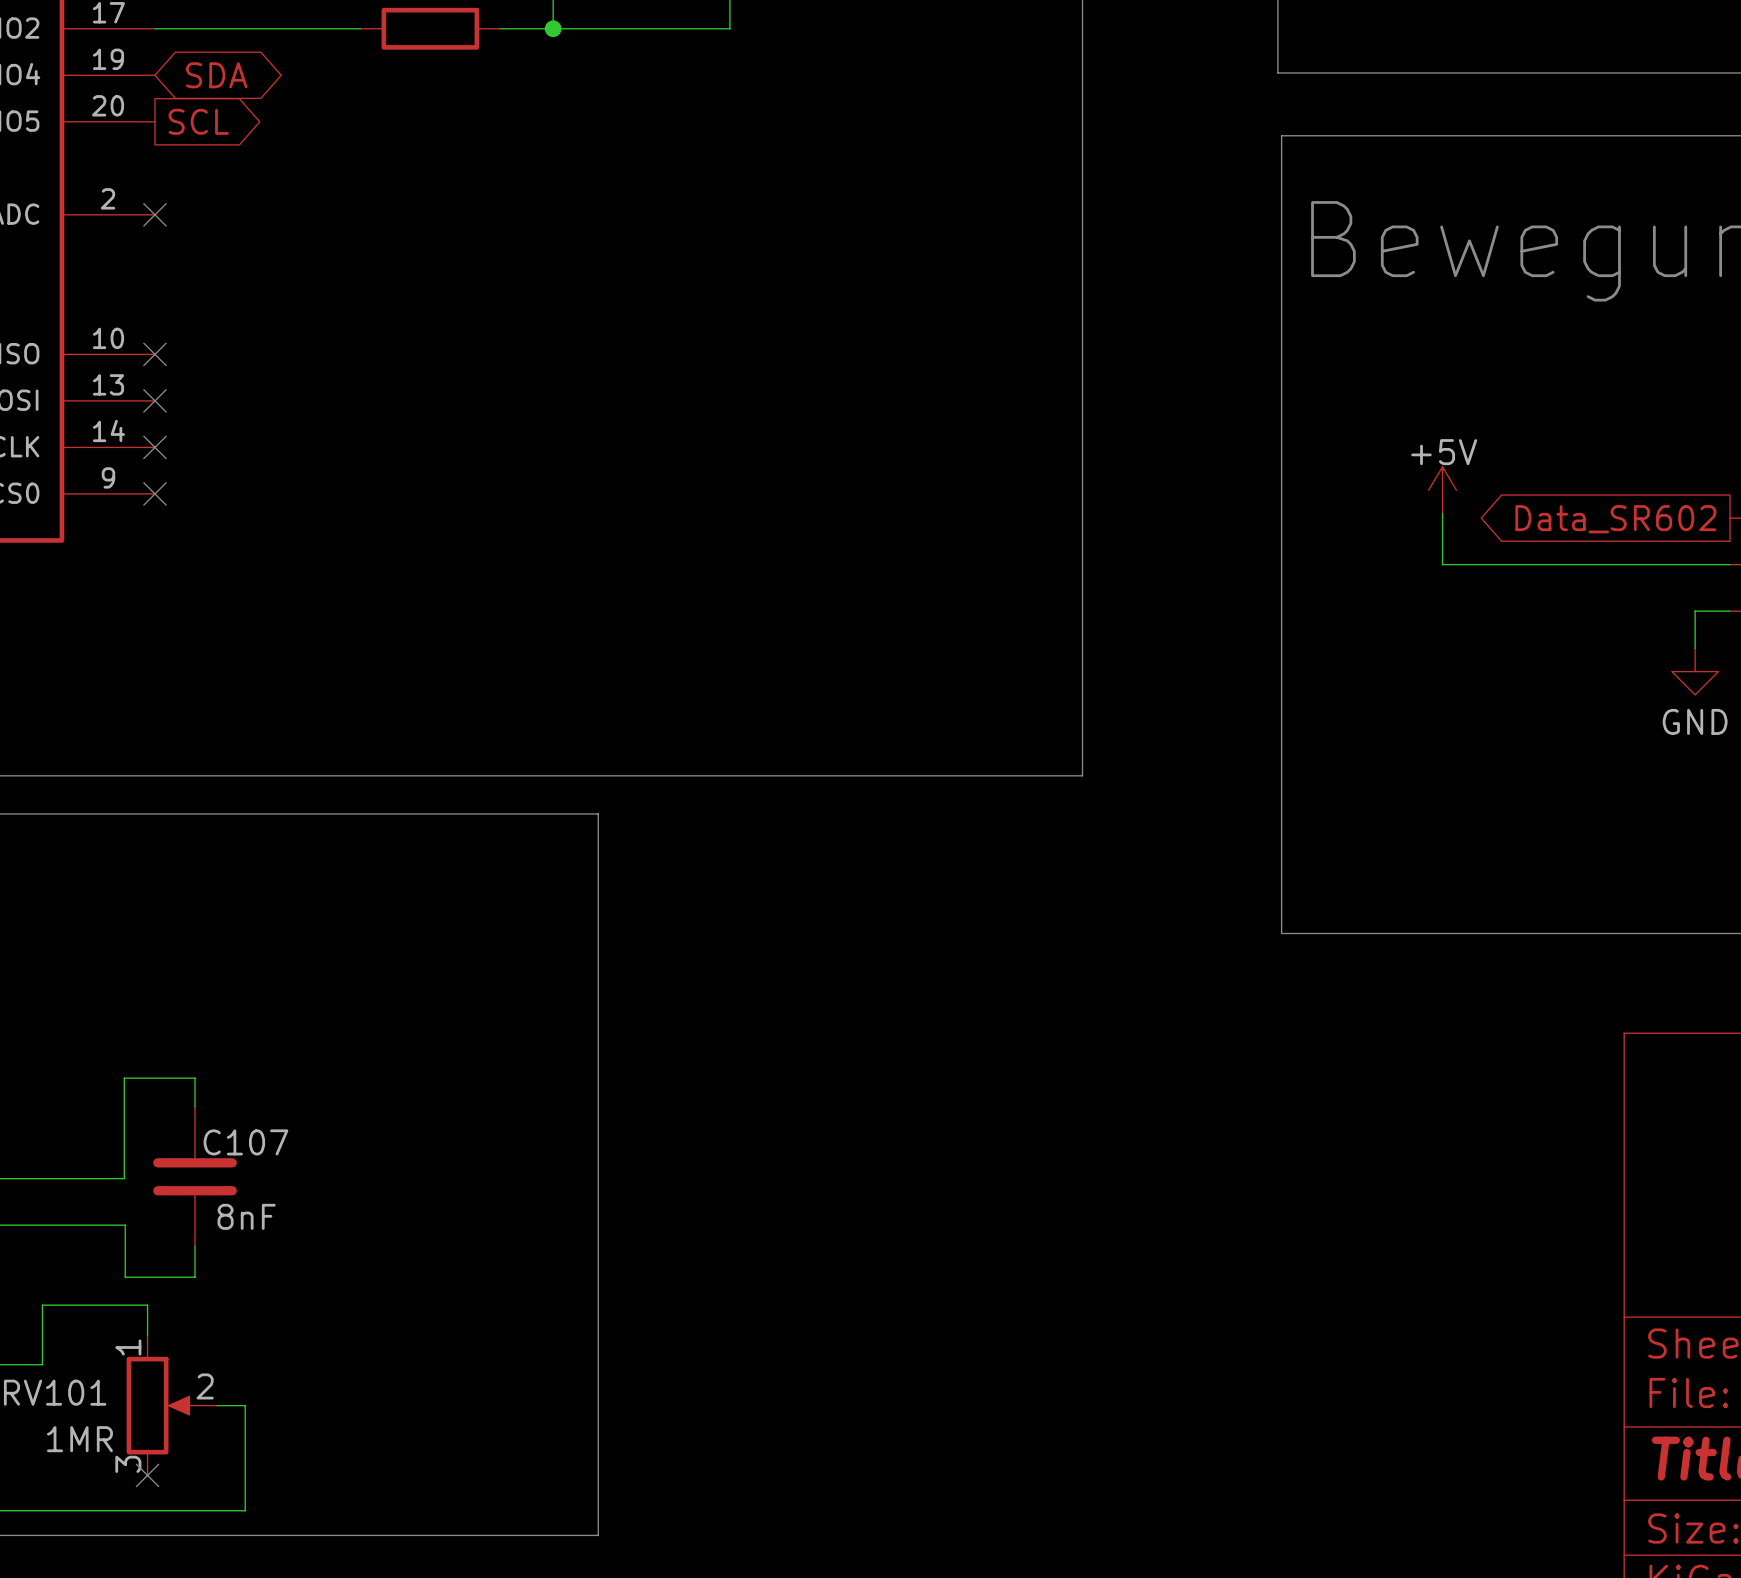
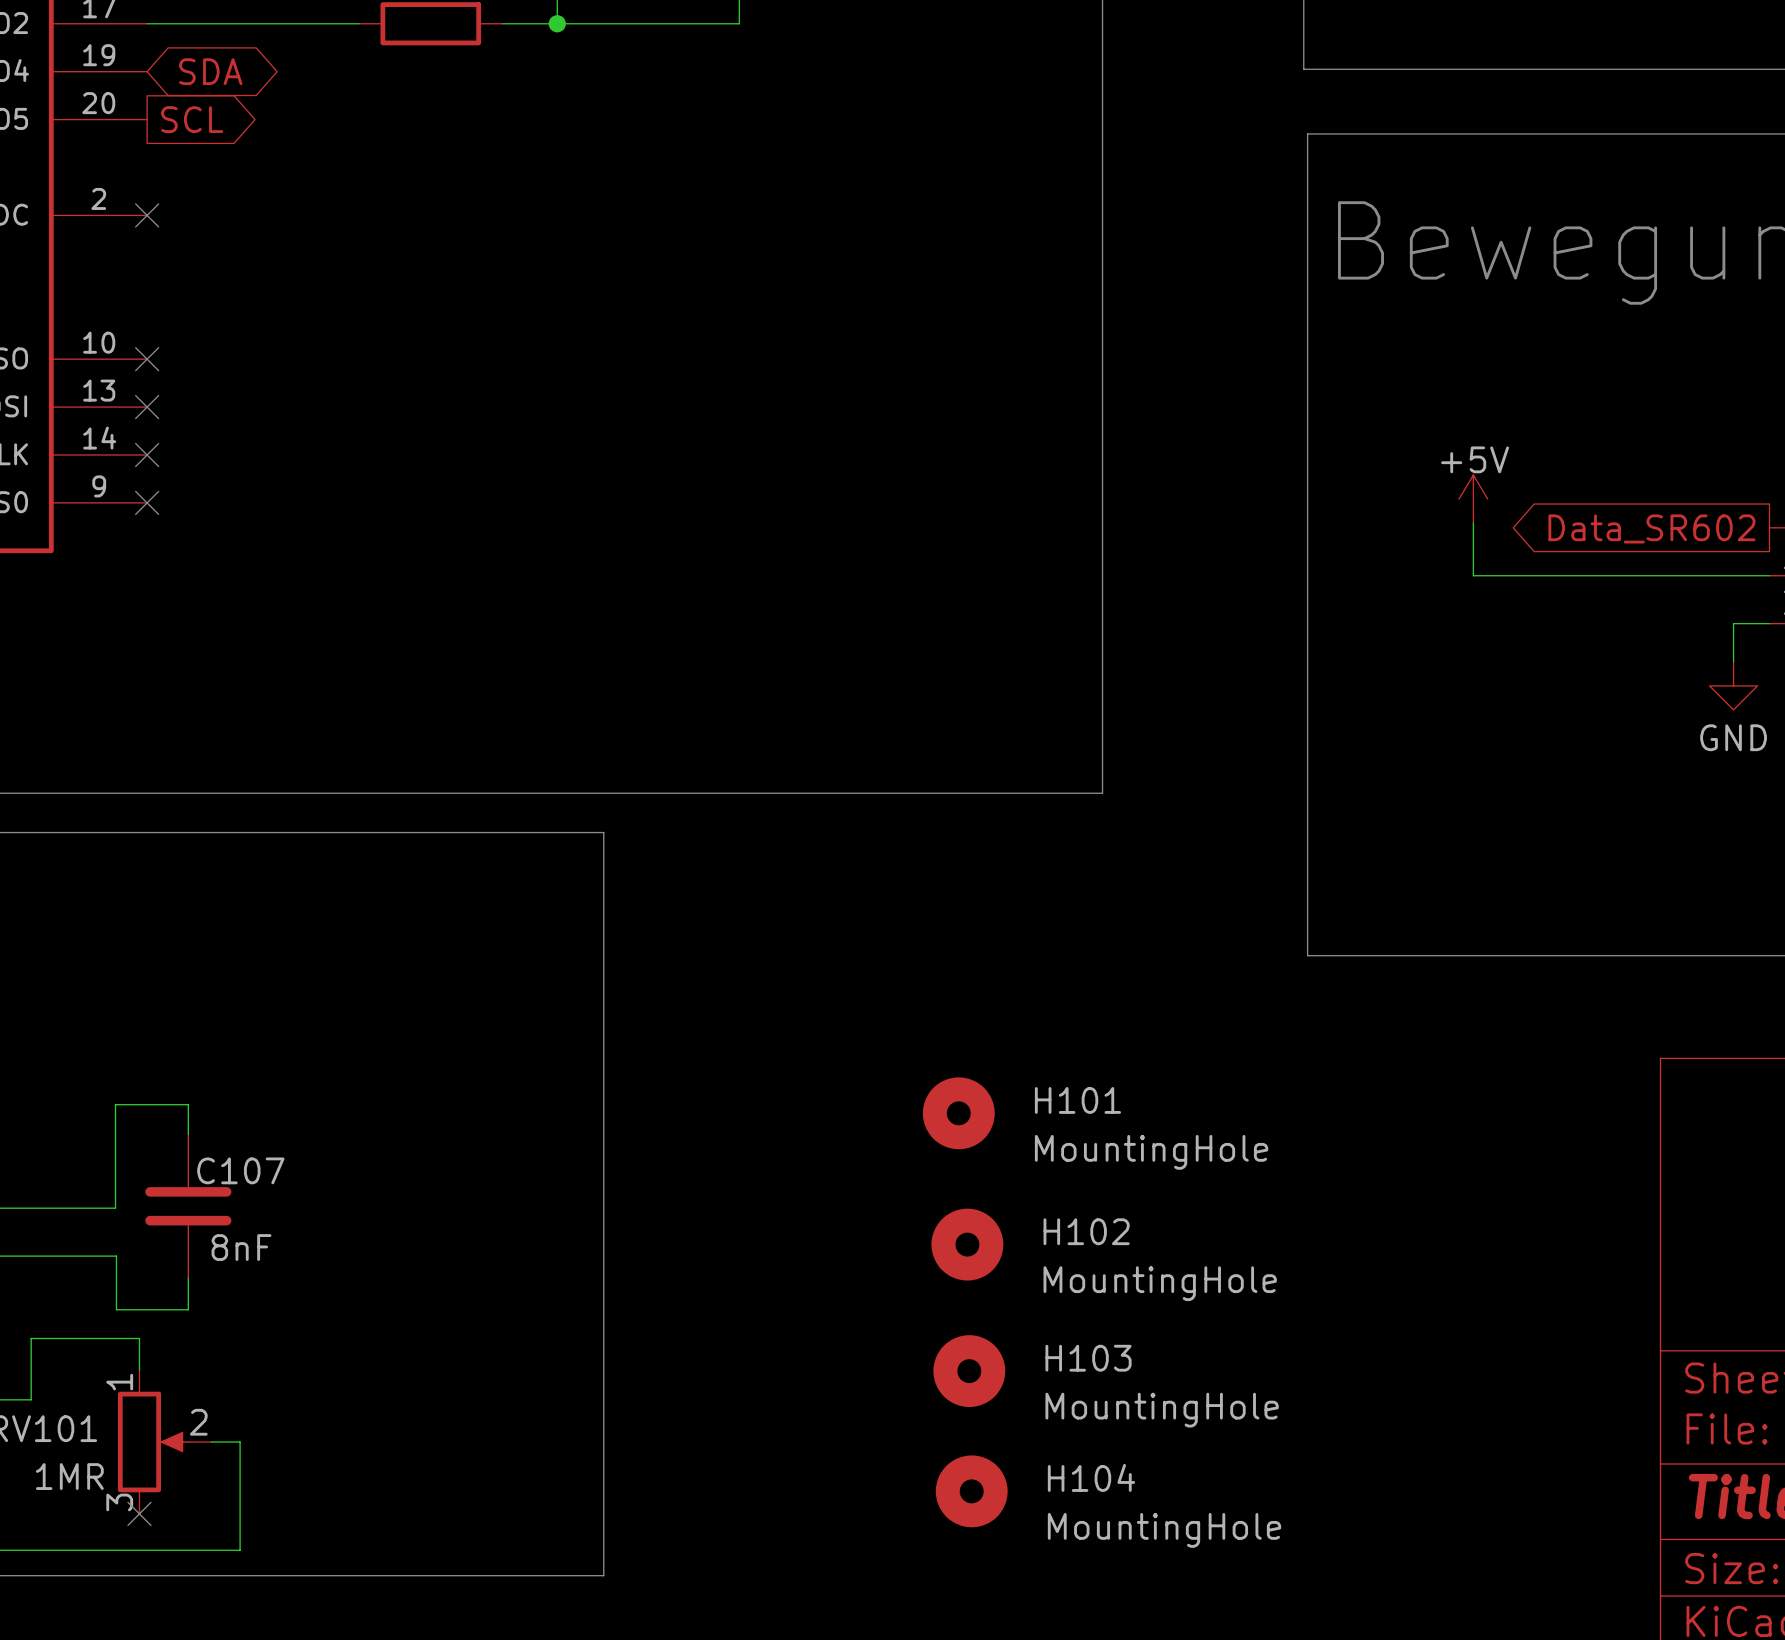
H101: none -> MountingHole (958, 1113)
H102: none -> MountingHole (967, 1244)
H103: none -> MountingHole (969, 1371)
H104: none -> MountingHole (971, 1491)

